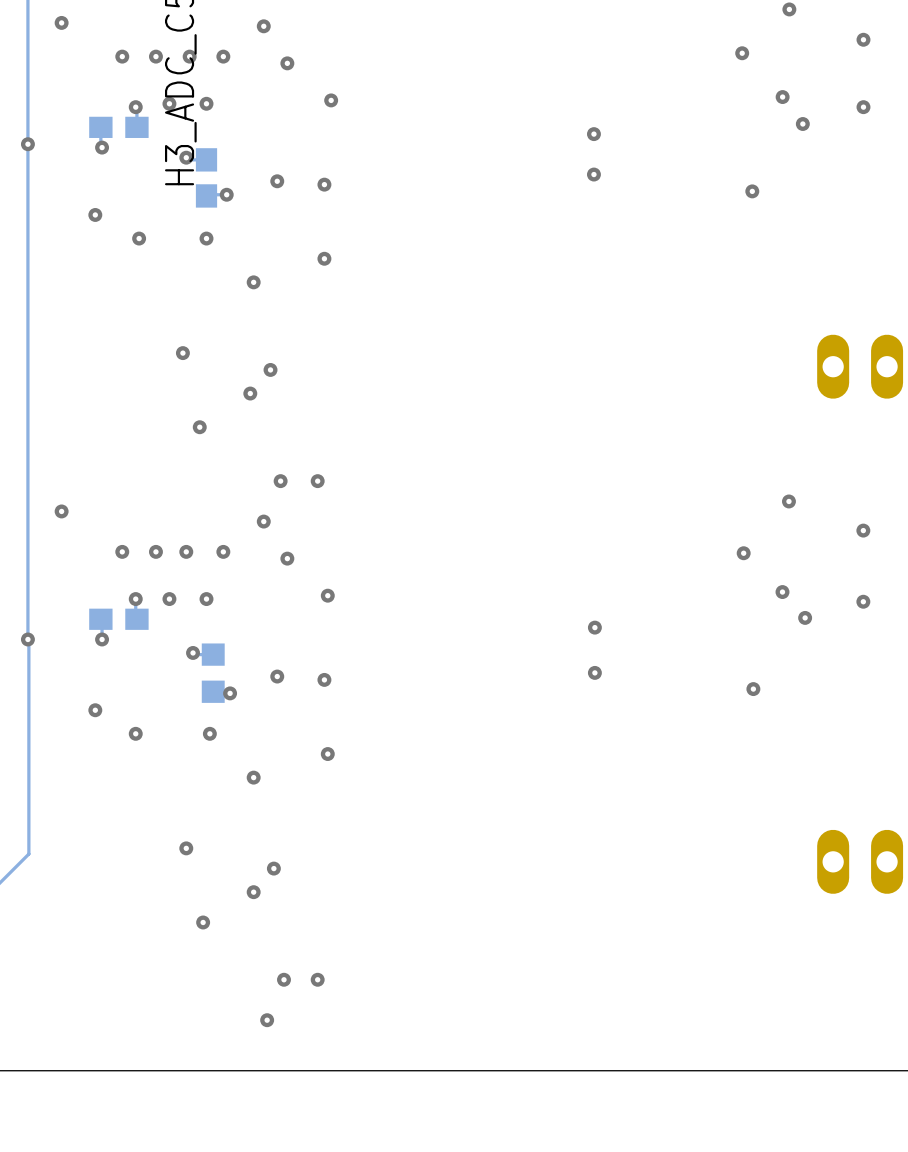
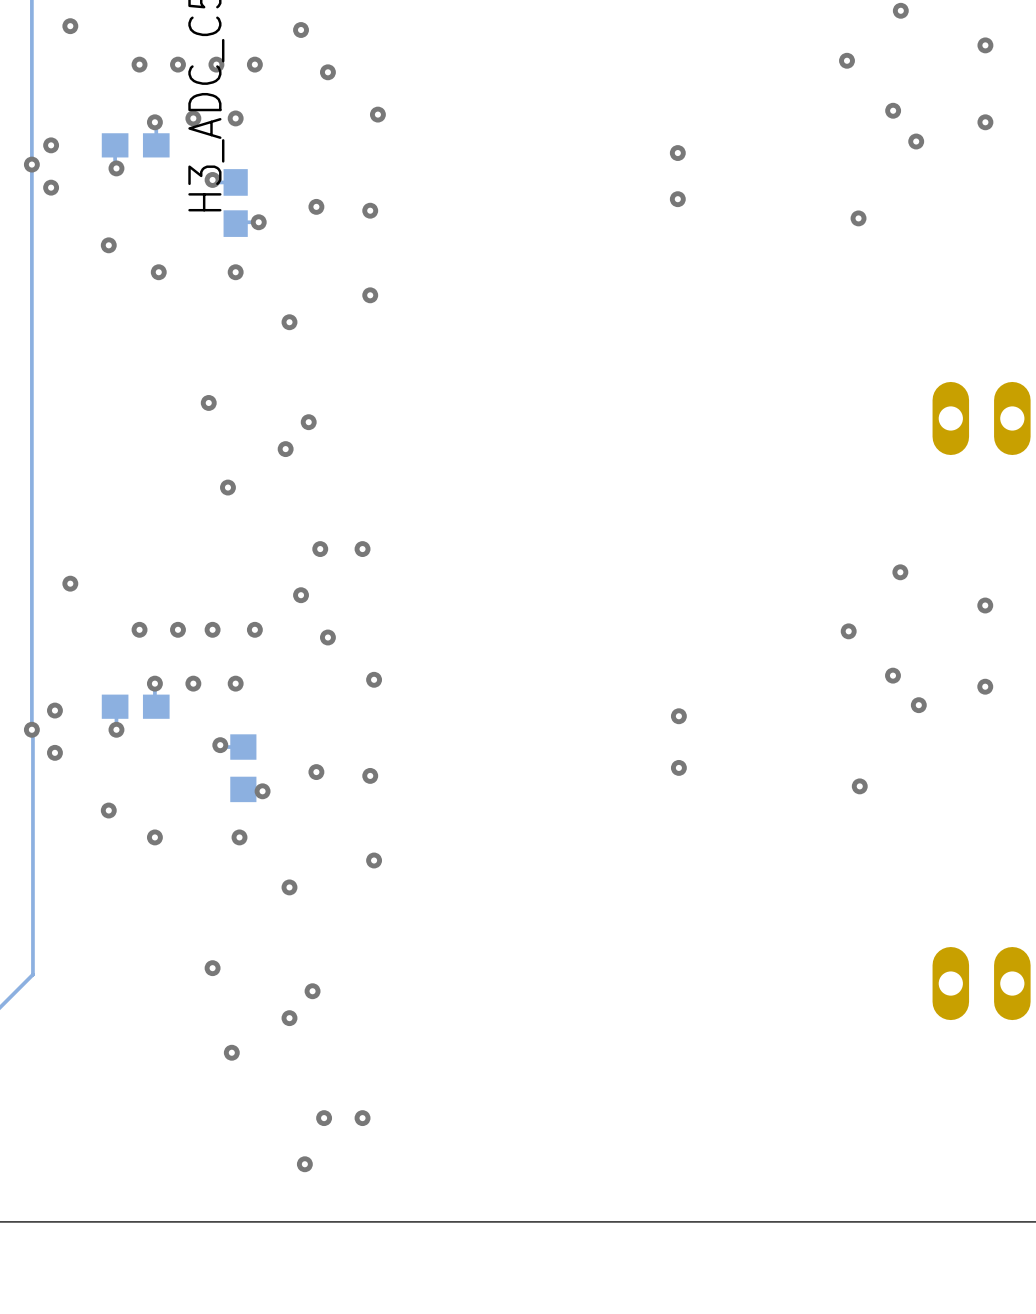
via: none -> (51, 145)
via: none -> (51, 187)
via: none -> (54, 710)
via: none -> (54, 752)

